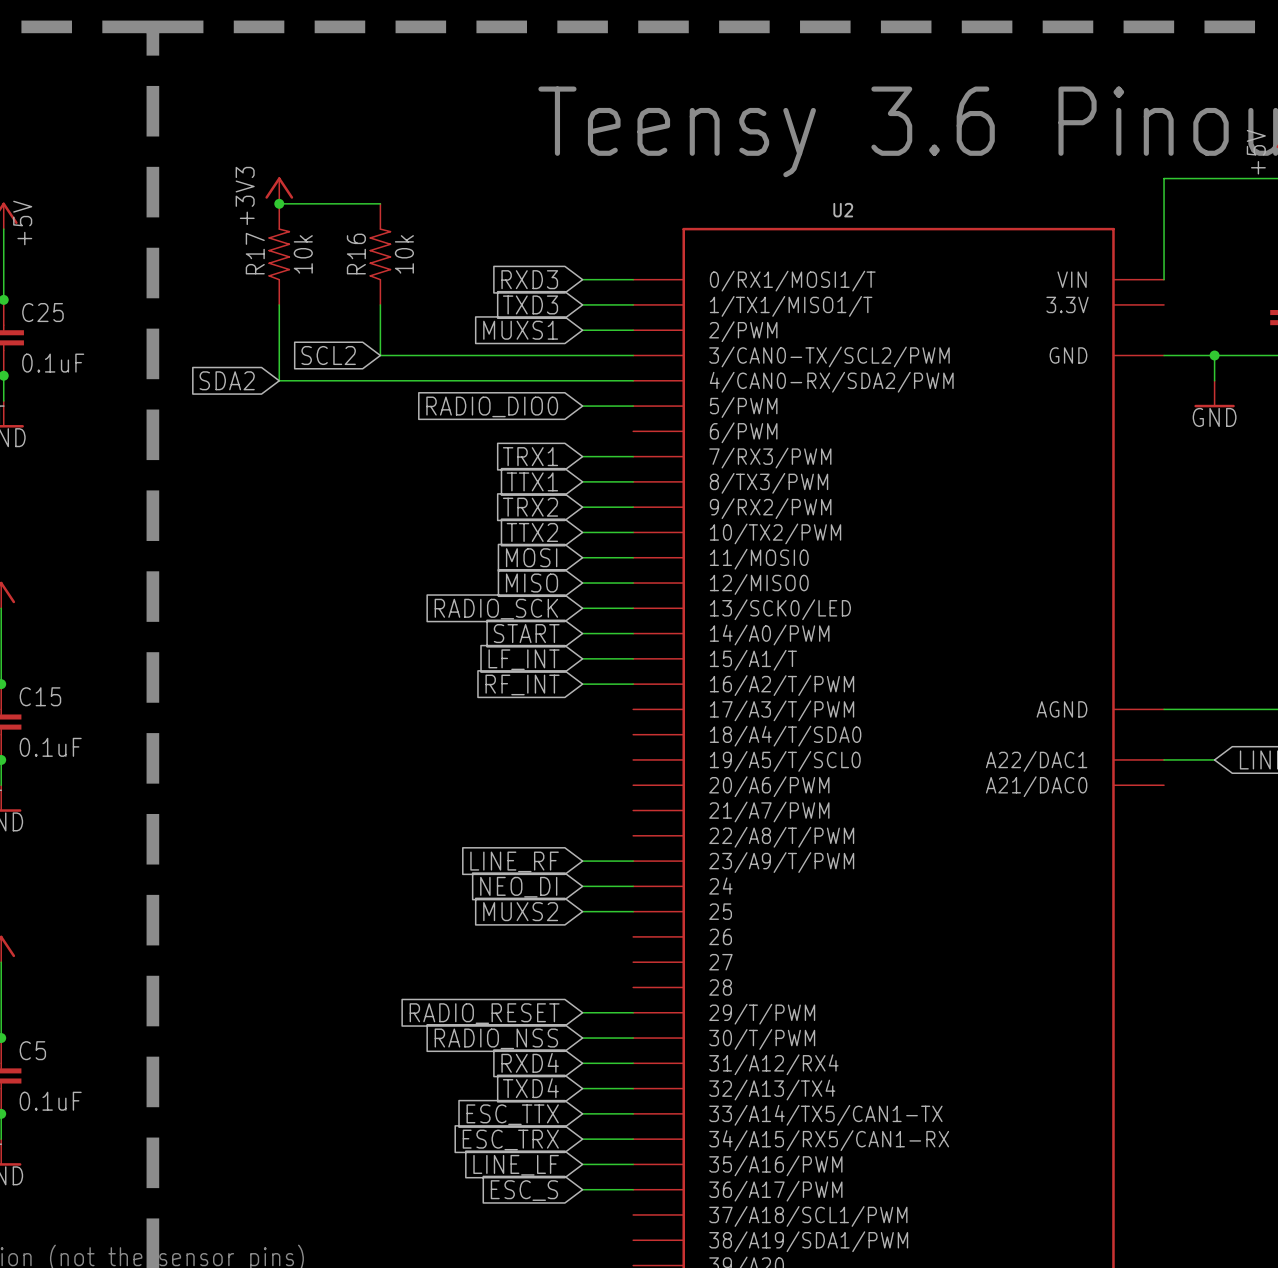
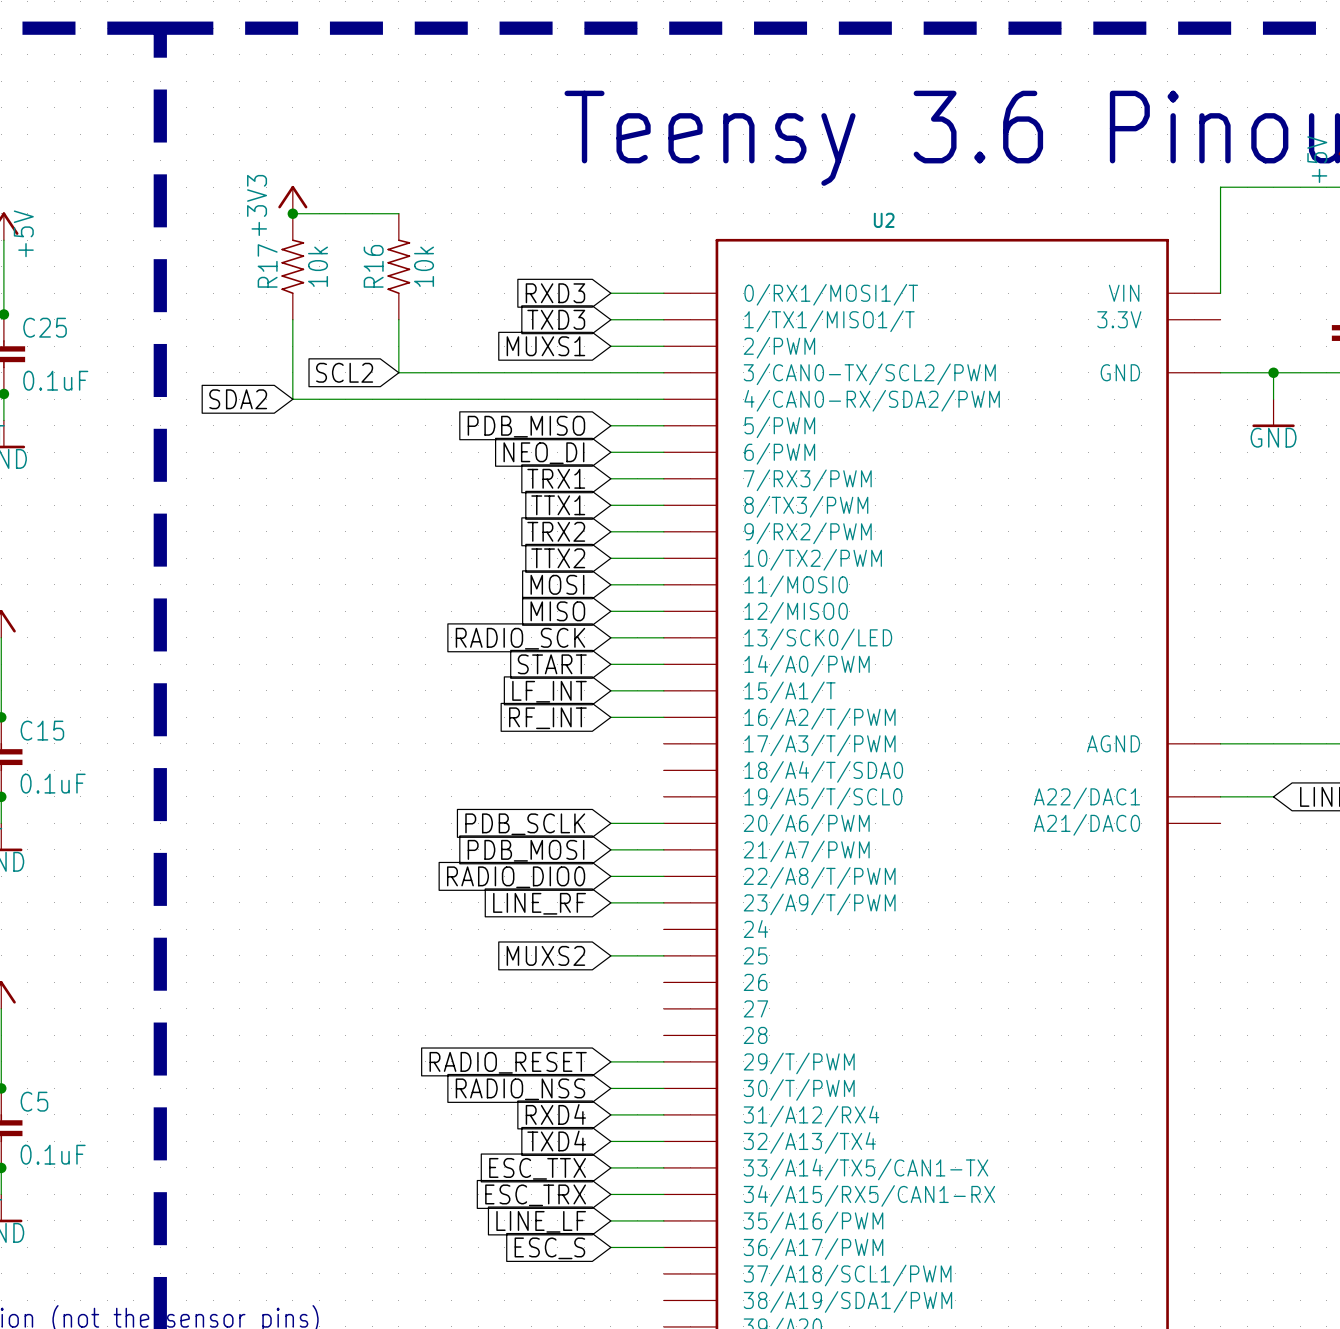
global label: RADIO_DIO0 (492, 406) -> PDB_MISO (526, 426)
wire: none -> (610, 452) (663, 452)
global label: none -> NEO_DI (543, 453)
wire: none -> (610, 823) (663, 823)
global label: none -> PDB_SCLK (525, 824)
wire: none -> (610, 849) (663, 849)
global label: none -> PDB_MOSI (526, 850)
global label: none -> RADIO_DIO0 (516, 877)
wire: (582, 886) (633, 886) -> (610, 876) (663, 876)
global label: NEO_DI (518, 887) -> none

